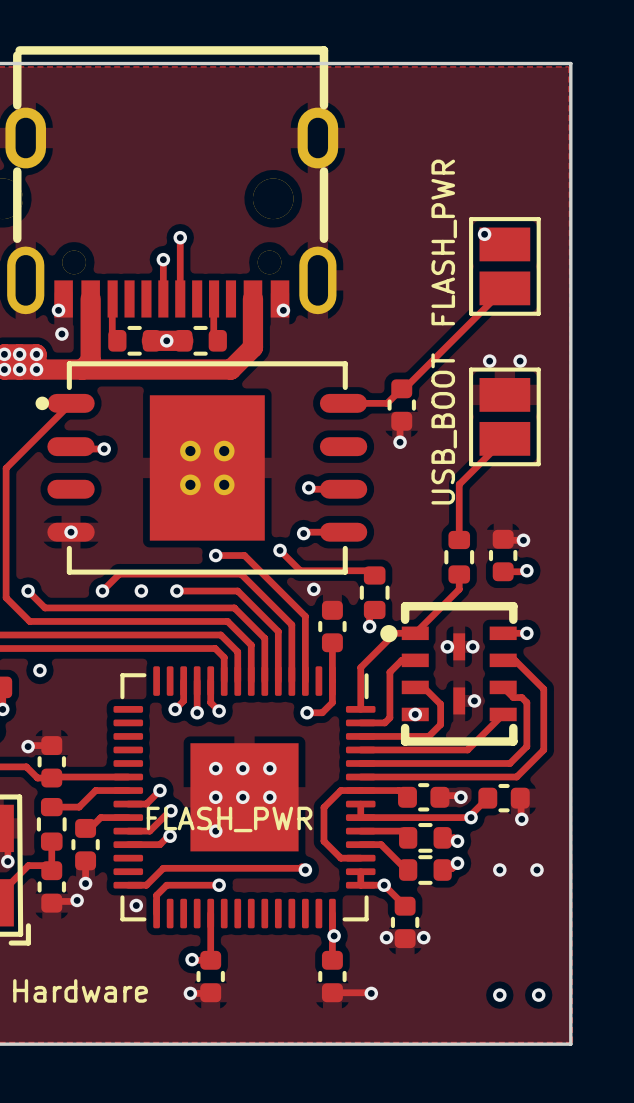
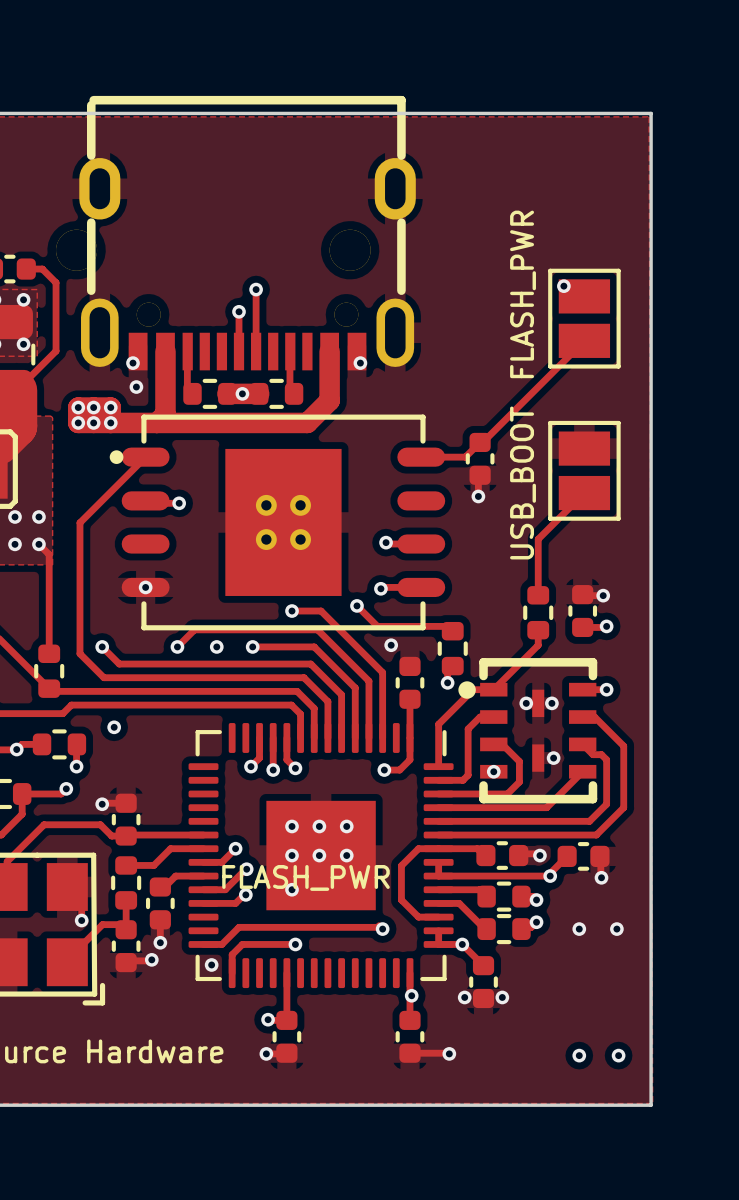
via: (489, 361) -> none
via: (520, 361) -> none

